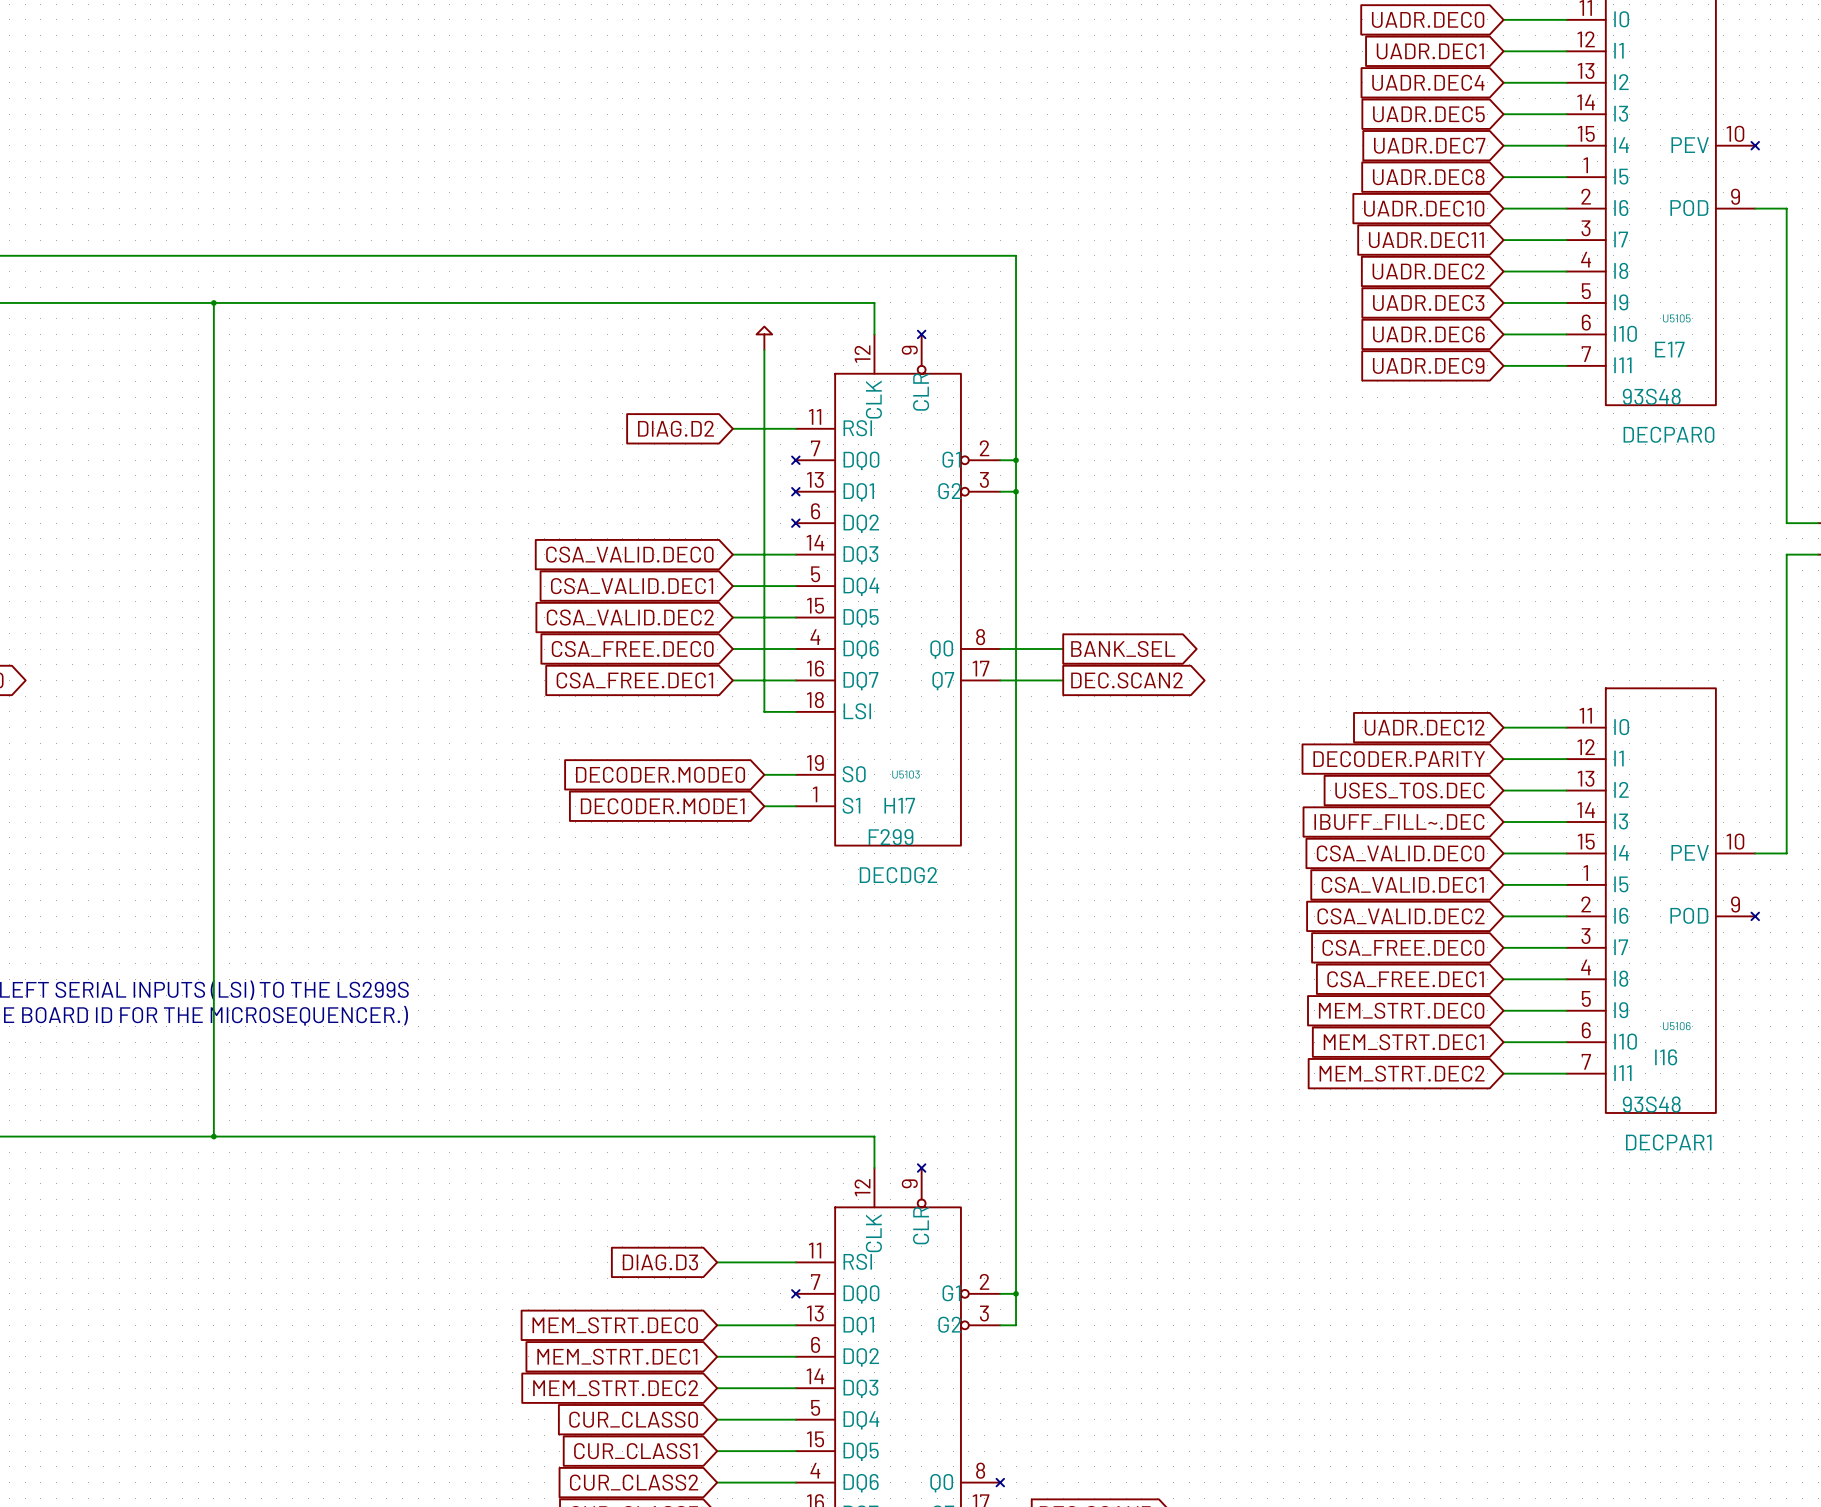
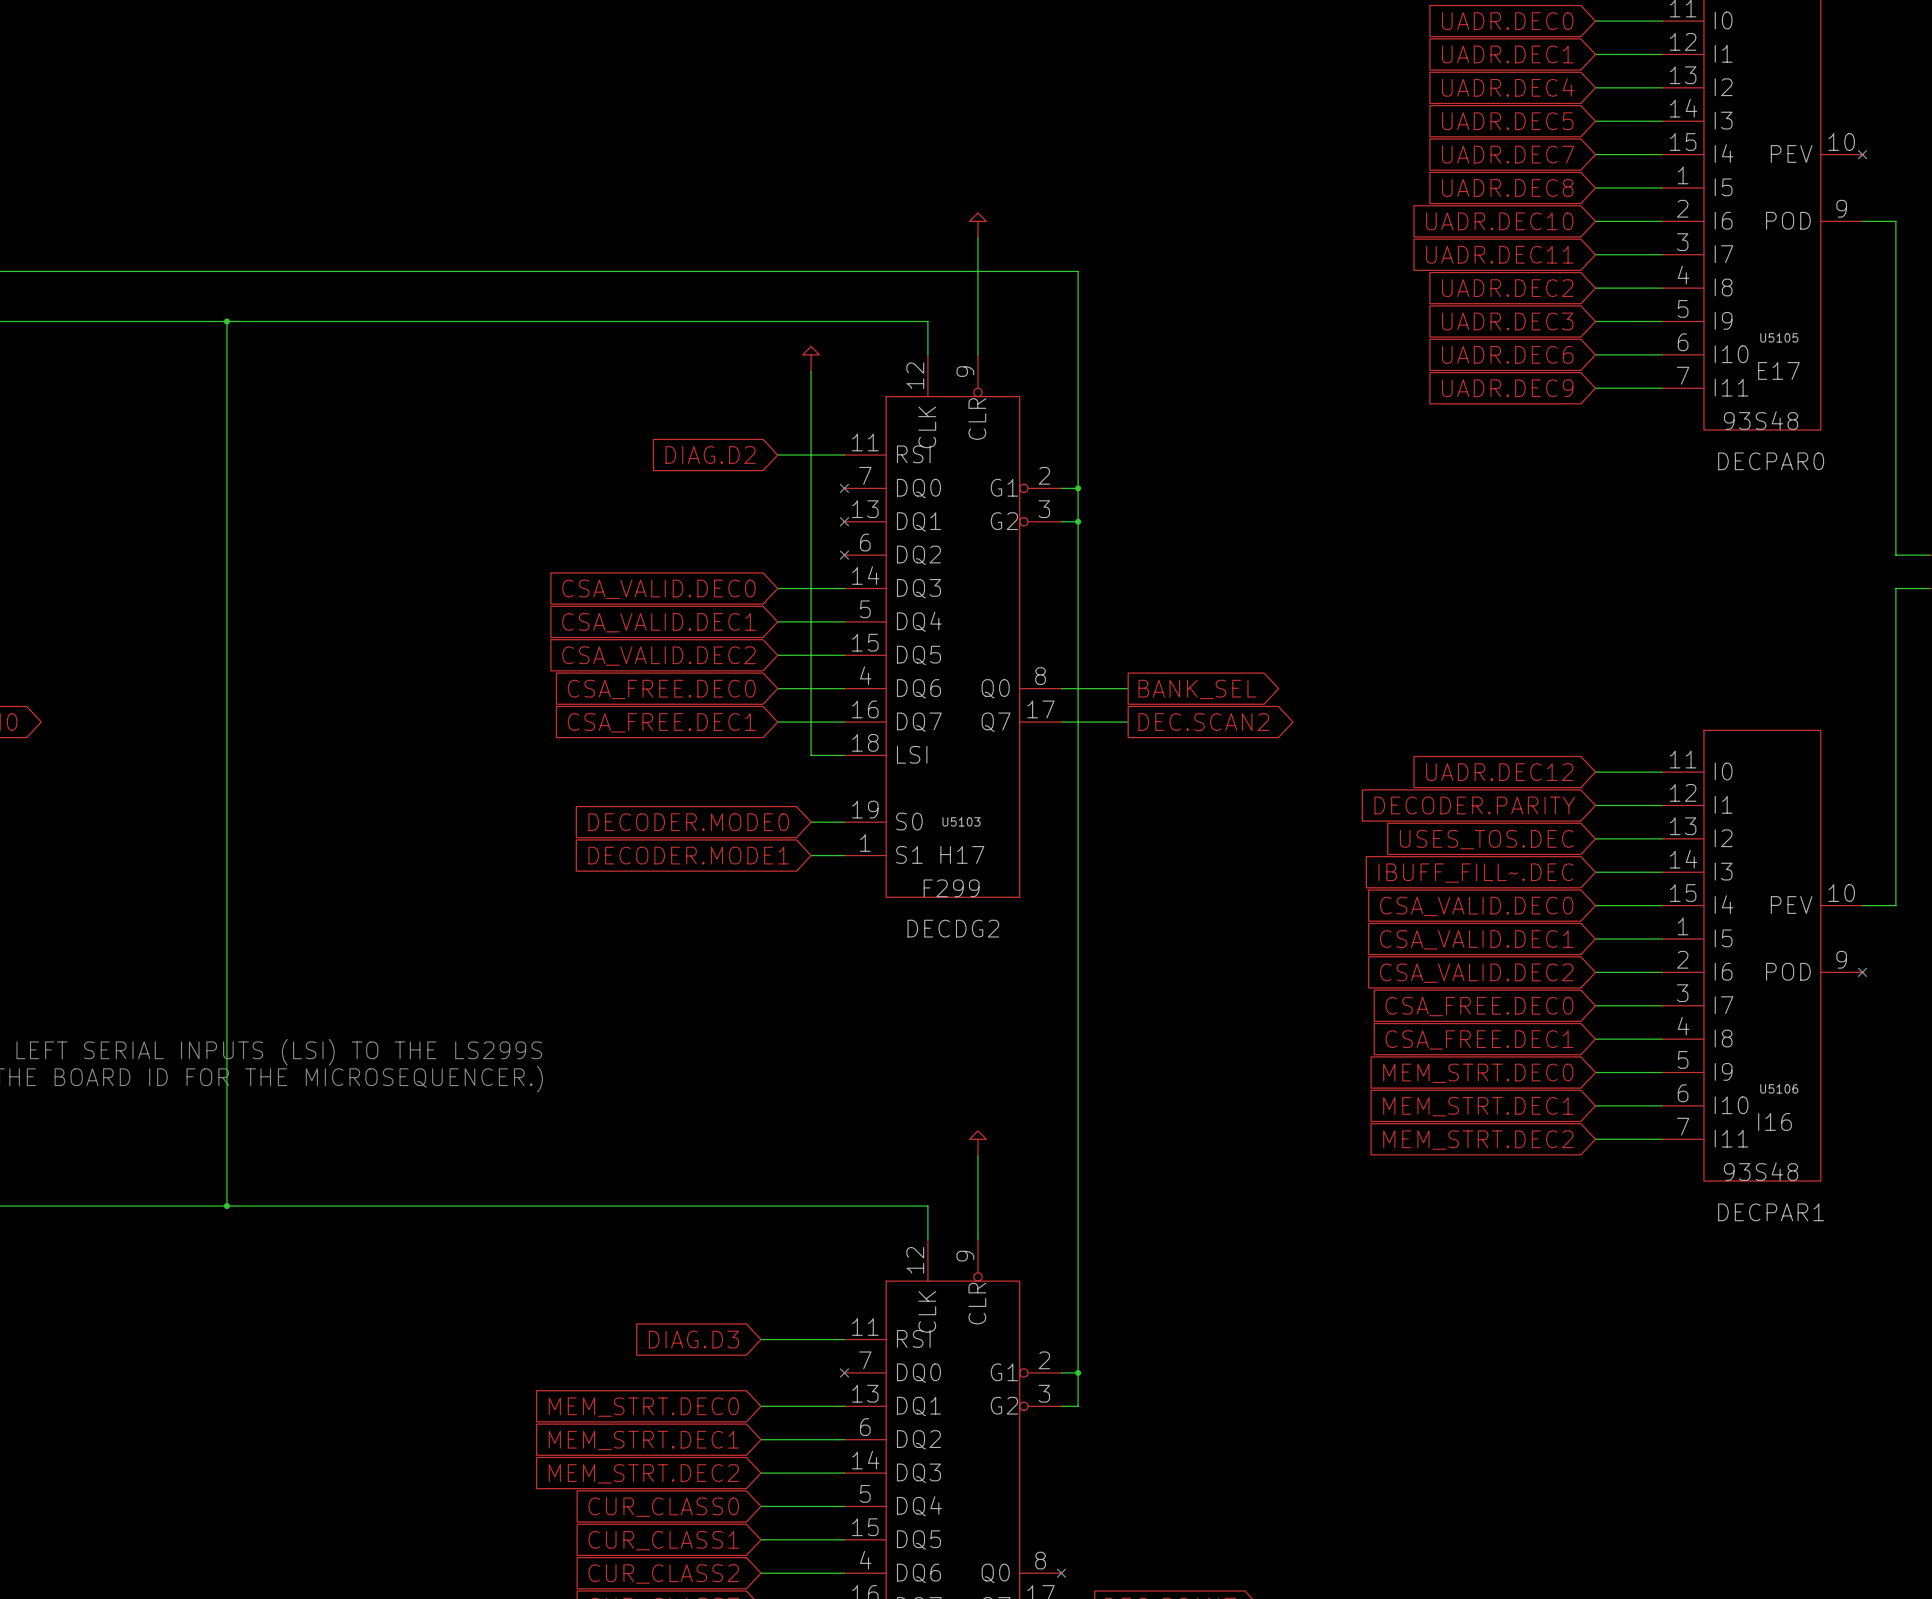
power symbol: none -> (977, 225)
wire: none -> (977, 238) (977, 354)
no-connect mark: (921, 334) -> none
power symbol: none -> (977, 1143)
wire: none -> (977, 1155) (977, 1239)
no-connect mark: (921, 1168) -> none

